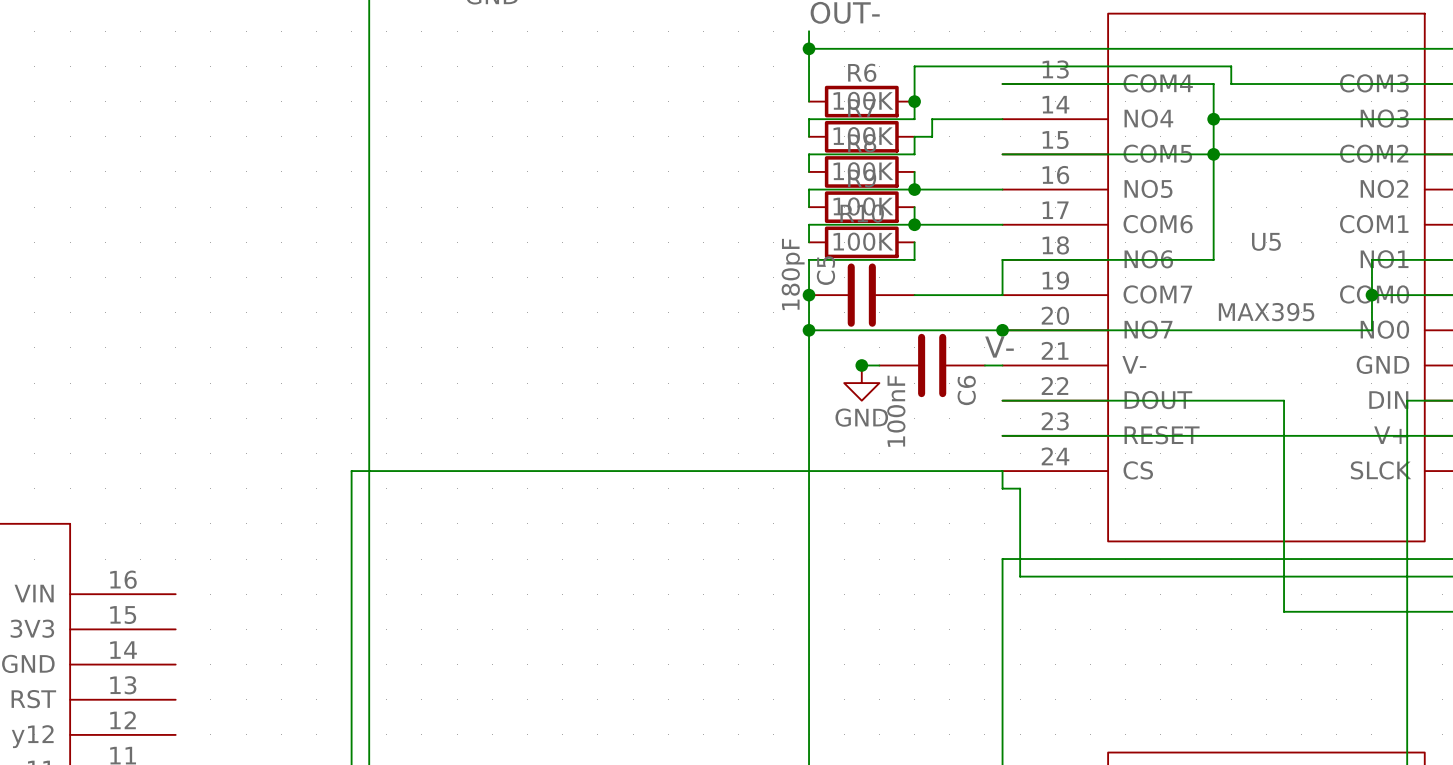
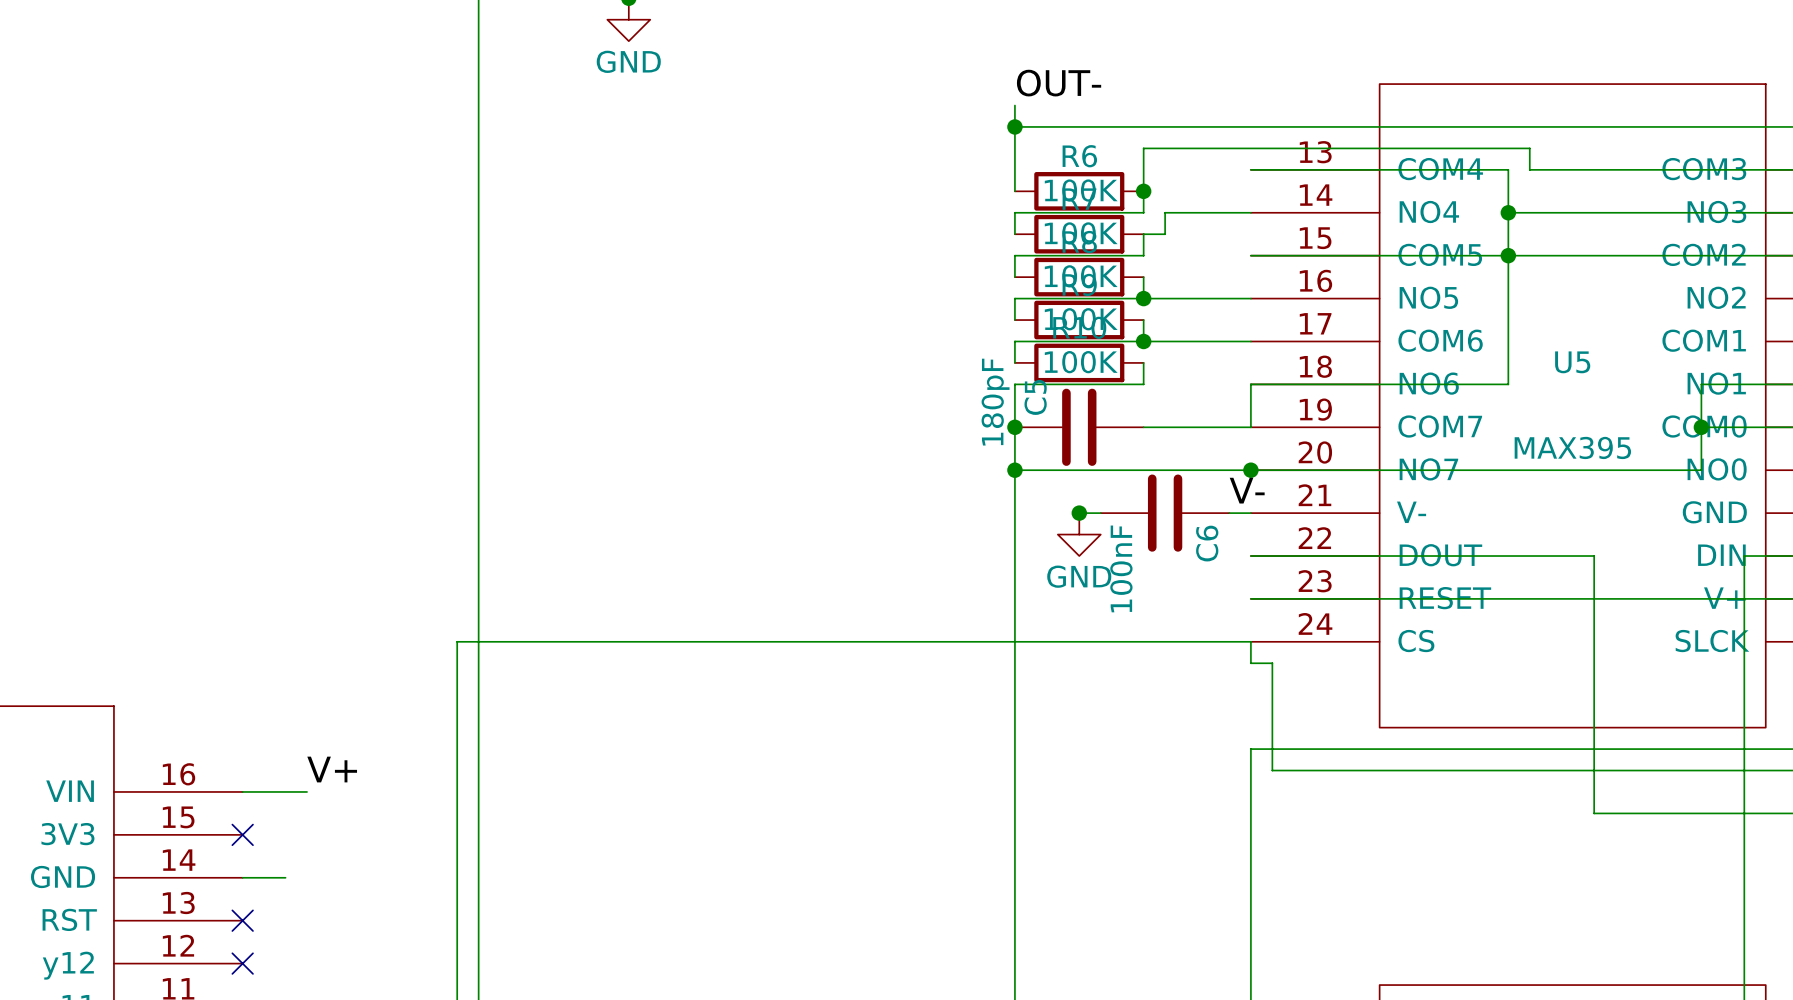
label: none -> V+ (332, 769)
wire: none -> (242, 791) (307, 791)
no-connect mark: none -> (242, 834)
wire: none -> (242, 877) (285, 877)
no-connect mark: none -> (242, 920)
no-connect mark: none -> (242, 963)

